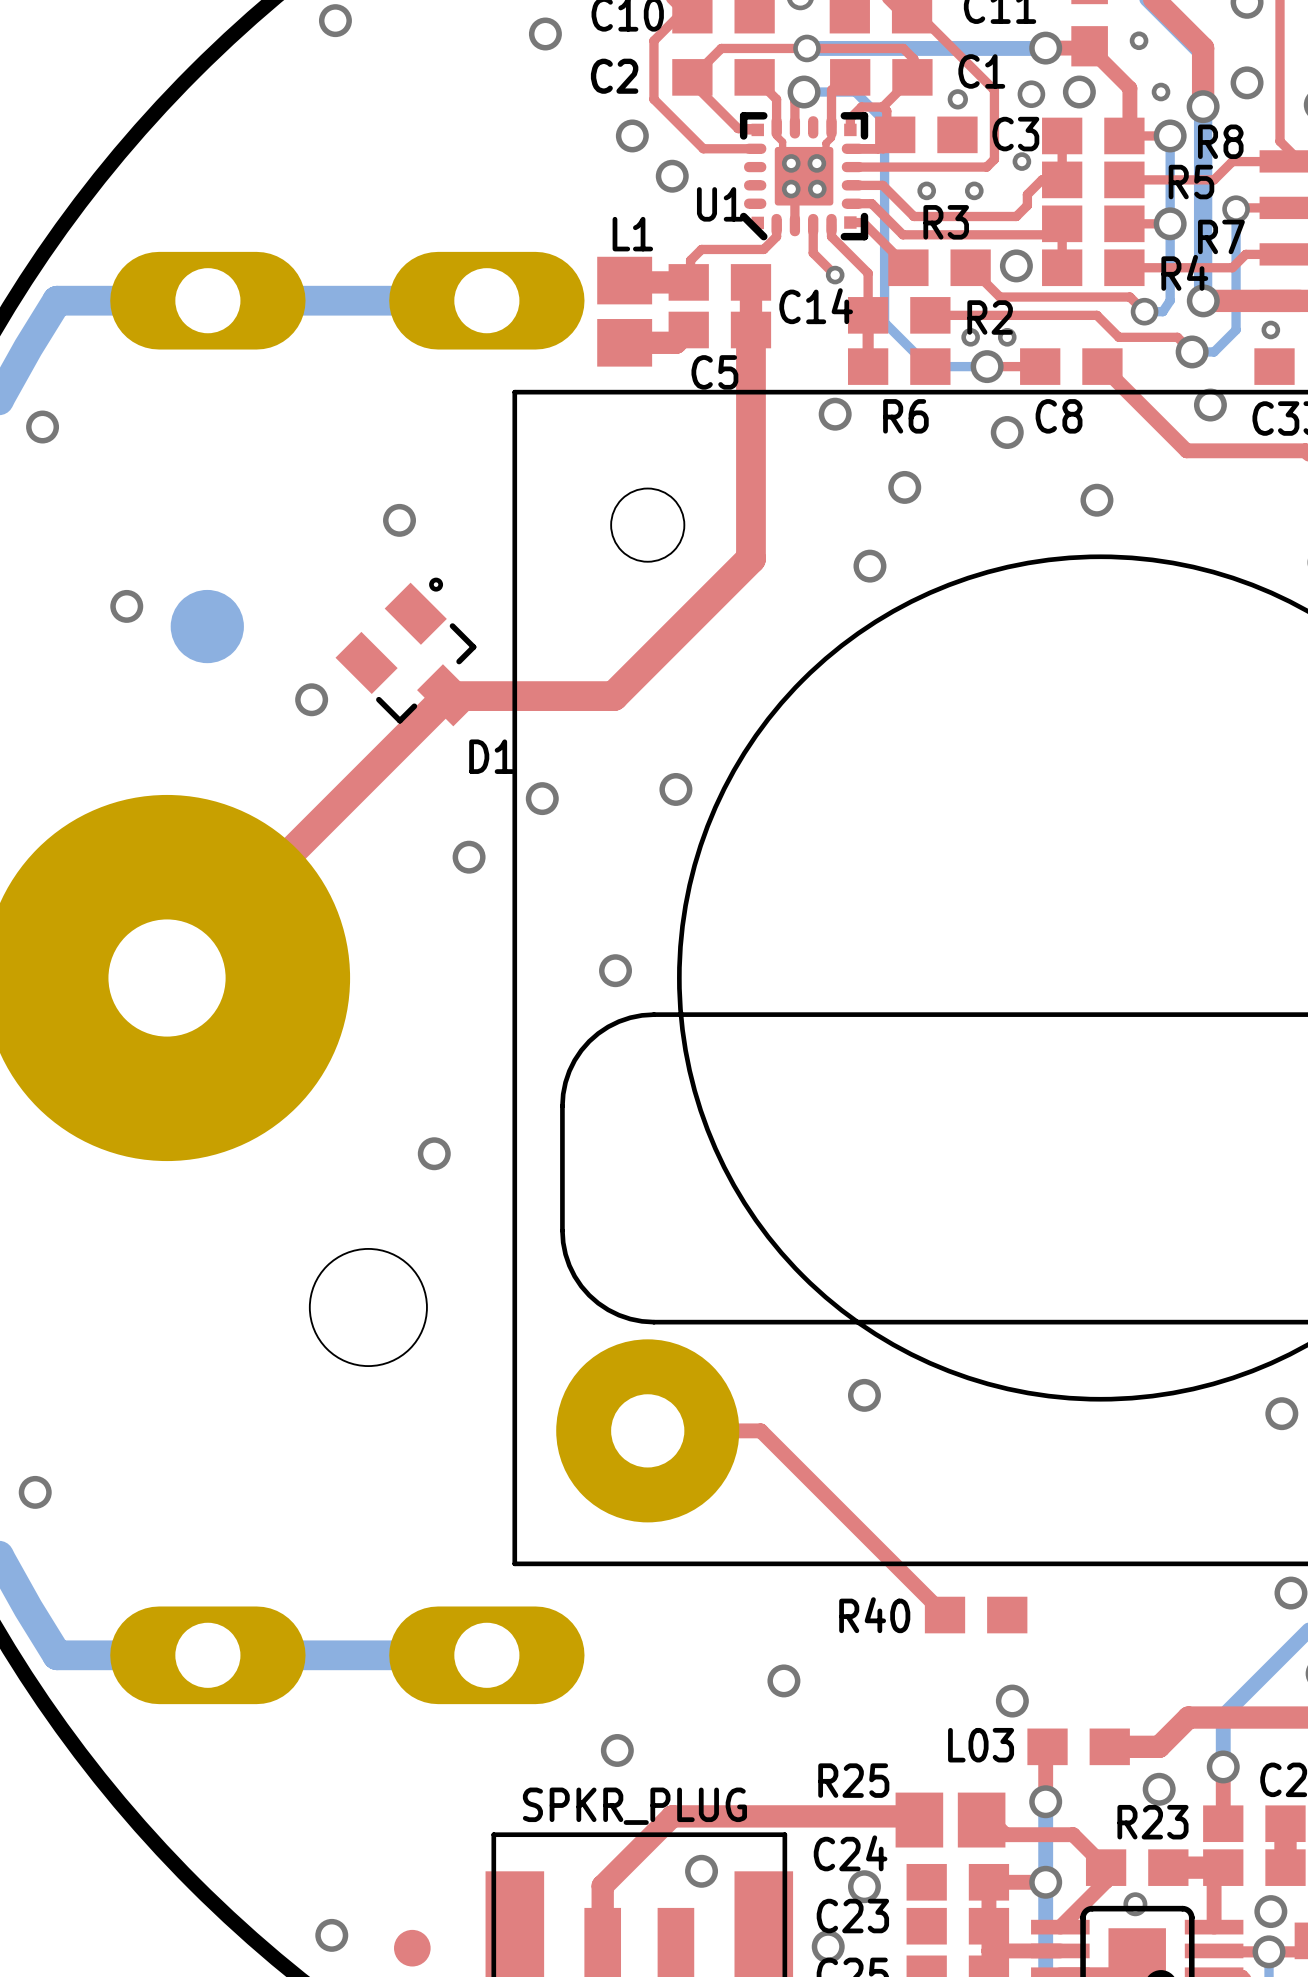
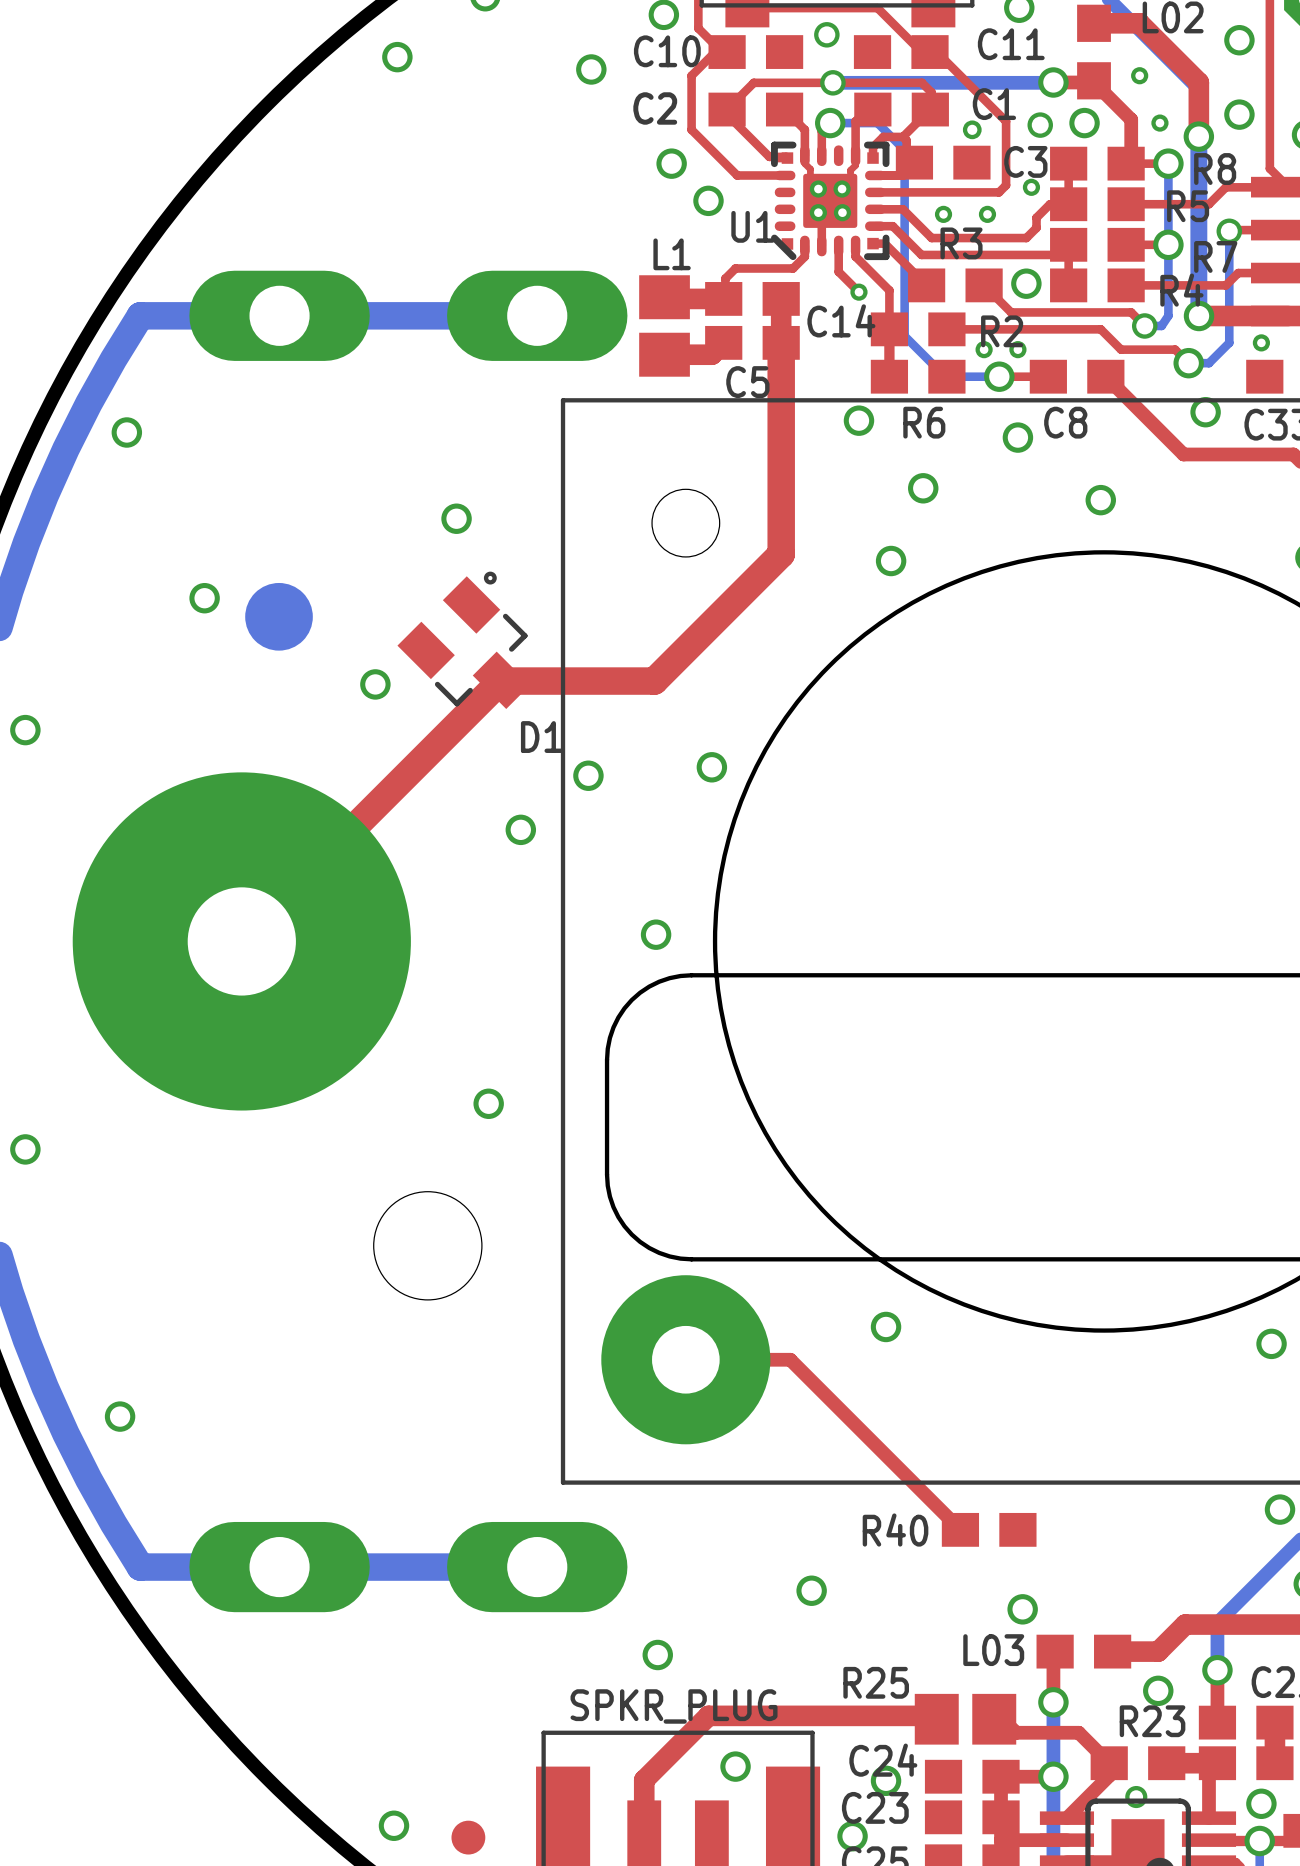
C24 name position: C24 (850, 1853) -> C24 (883, 1760)

